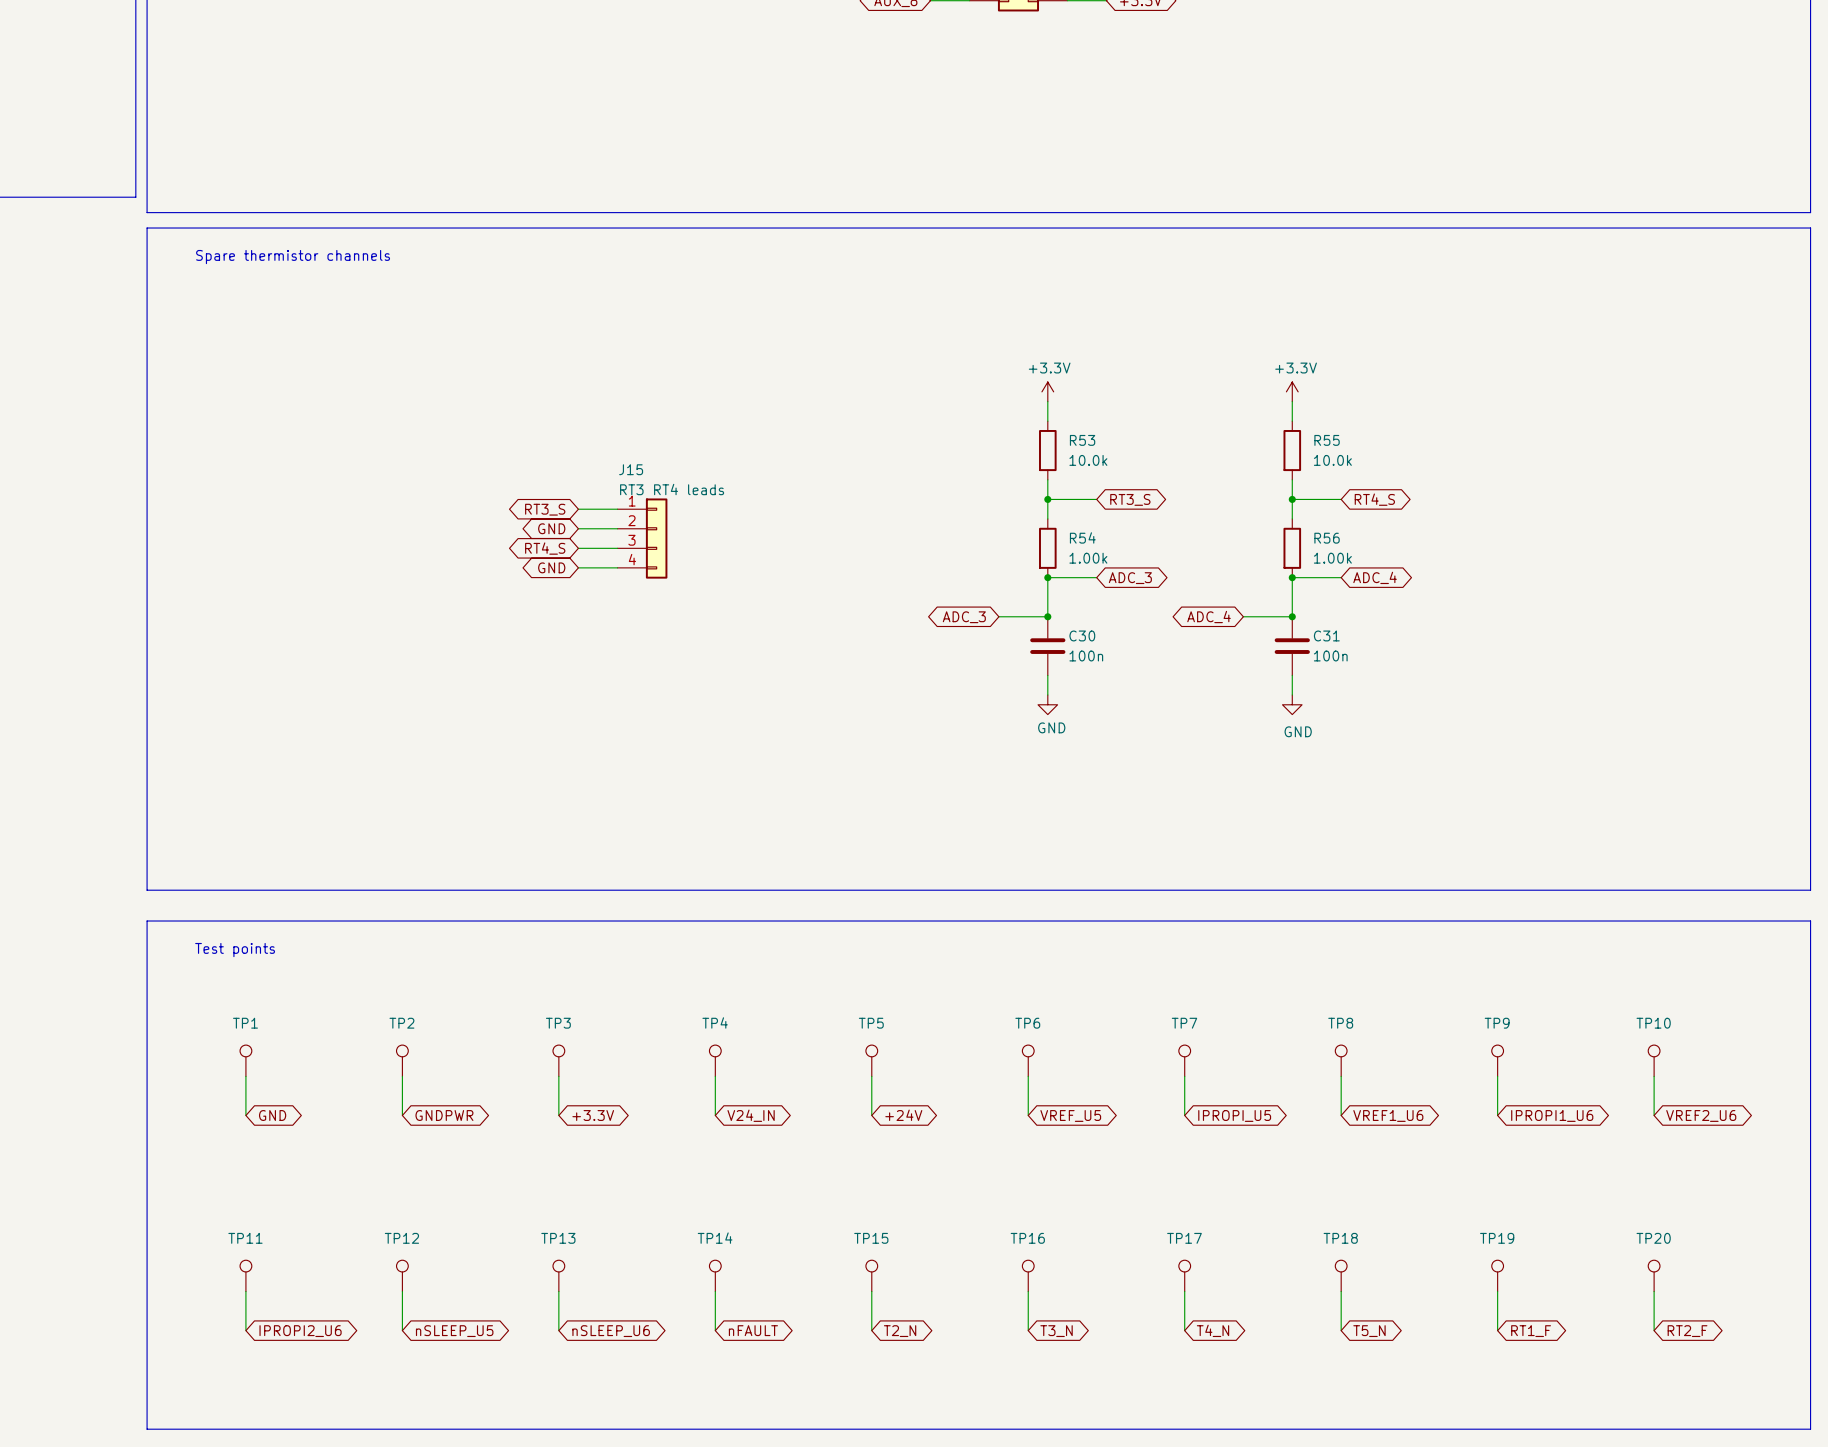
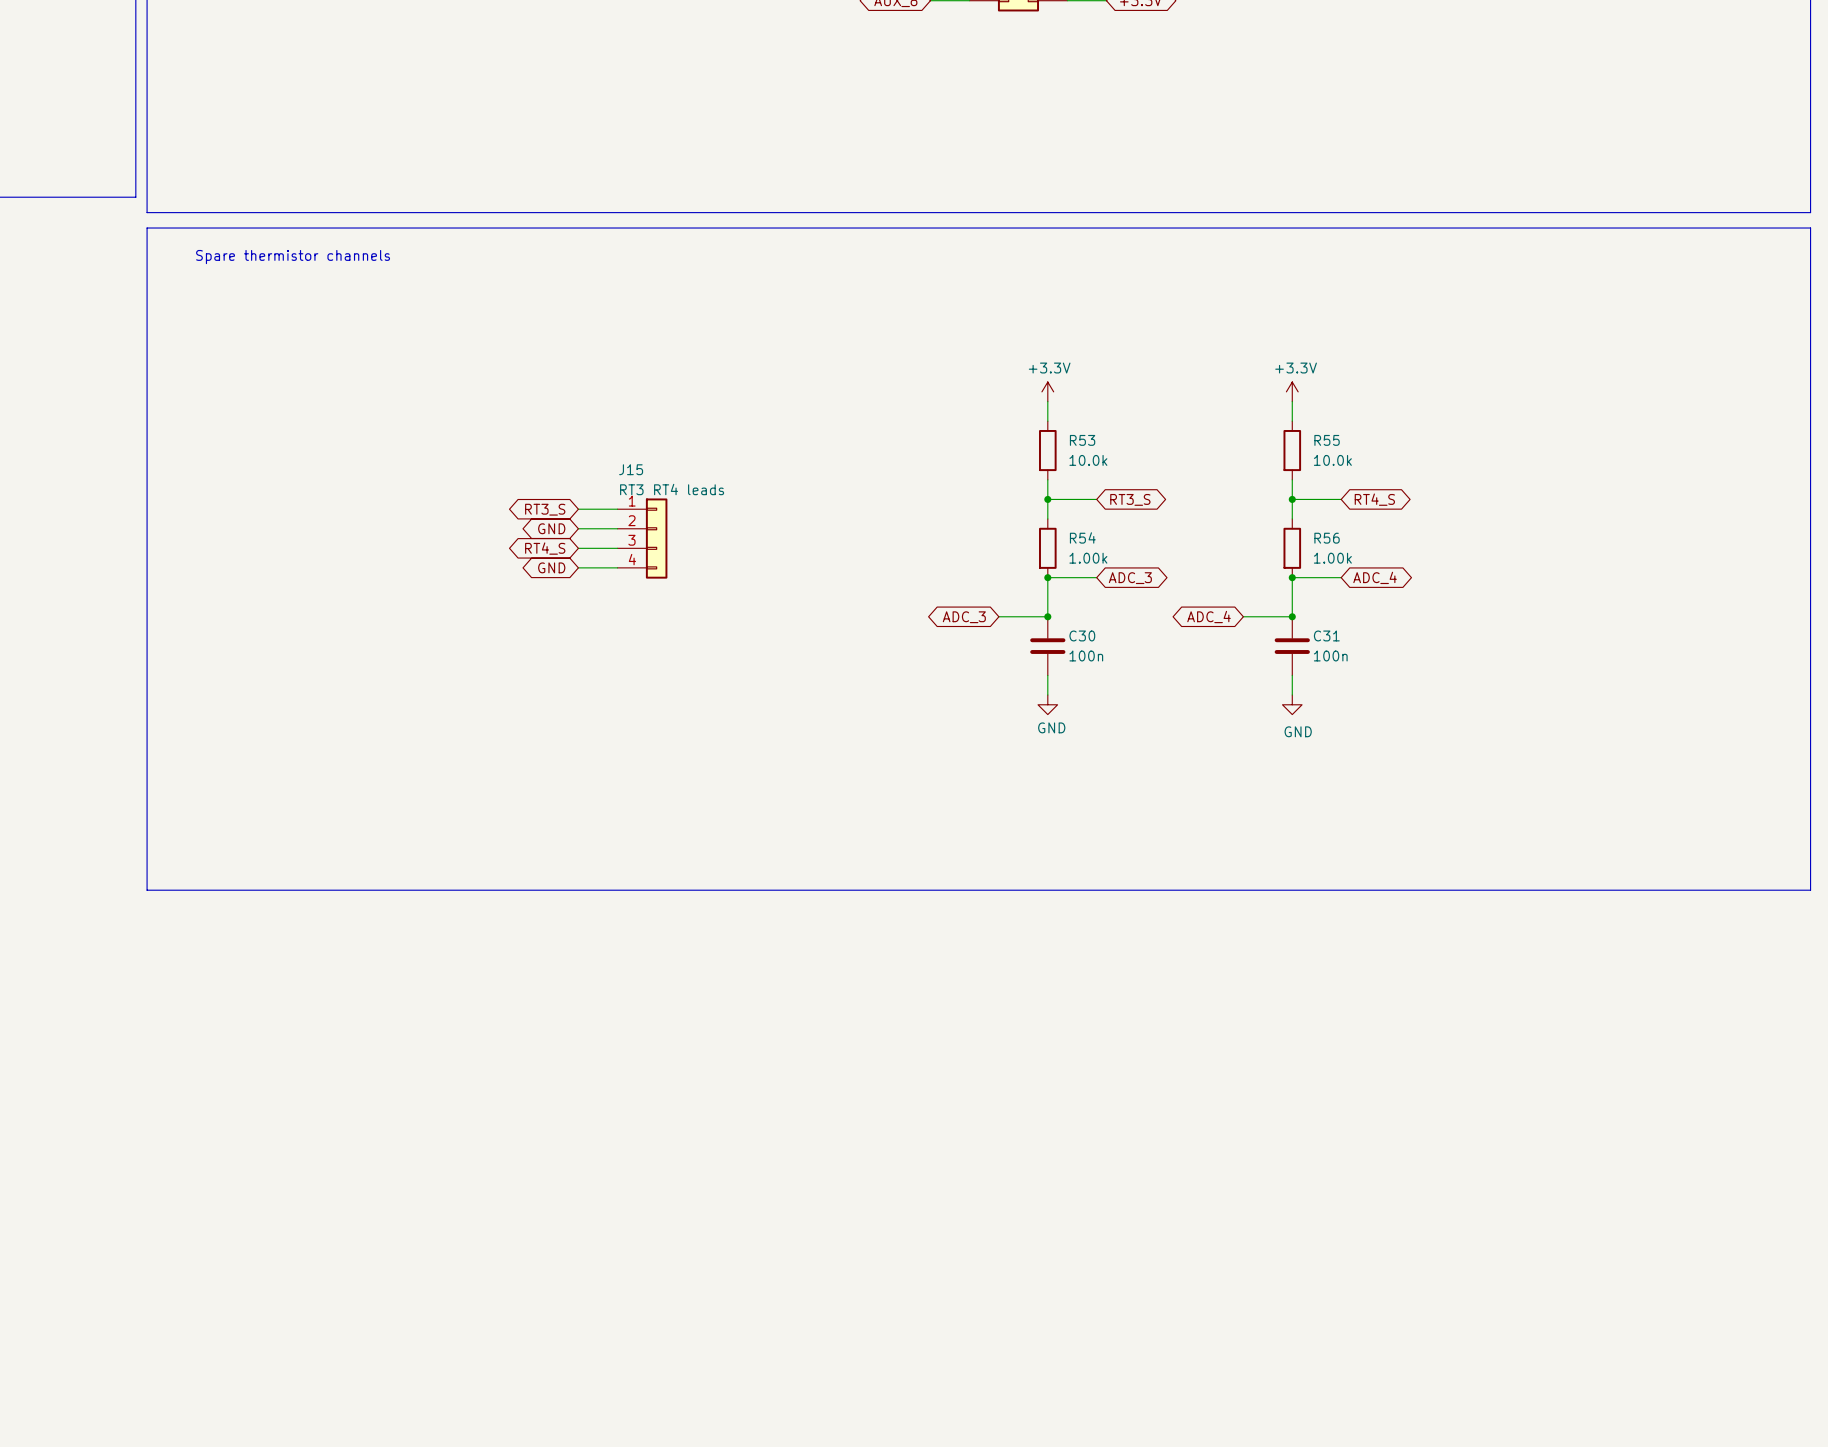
line: (147, 921) (1810, 921) (1810, 1429) (147, 1429) (147, 921) -> none
text: Test points (235, 950) -> none
TP1: (245, 1060) -> none
TP2: (402, 1060) -> none
TP3: (558, 1060) -> none
TP4: (715, 1060) -> none
TP5: (871, 1060) -> none
TP6: (1028, 1060) -> none
TP7: (1184, 1060) -> none
TP8: (1341, 1060) -> none
TP9: (1497, 1060) -> none
TP10: (1654, 1060) -> none
wire: (245, 1076) (245, 1115) -> none
wire: (402, 1076) (402, 1115) -> none
wire: (558, 1076) (558, 1115) -> none
wire: (715, 1076) (715, 1115) -> none
wire: (871, 1076) (871, 1115) -> none
wire: (1028, 1076) (1028, 1115) -> none
wire: (1184, 1076) (1184, 1115) -> none
wire: (1341, 1076) (1341, 1115) -> none
wire: (1497, 1076) (1497, 1115) -> none
wire: (1654, 1076) (1654, 1115) -> none
global label: GND (272, 1115) -> none
global label: GNDPWR (444, 1115) -> none
global label: +3.3V (593, 1115) -> none
global label: V24_IN (751, 1115) -> none
global label: +24V (903, 1115) -> none
global label: VREF_U5 (1070, 1115) -> none
global label: IPROPI_U5 (1234, 1115) -> none
global label: VREF1_U6 (1388, 1115) -> none
global label: IPROPI1_U6 (1552, 1115) -> none
global label: VREF2_U6 (1701, 1115) -> none
TP11: (245, 1275) -> none
TP12: (402, 1275) -> none
TP13: (558, 1275) -> none
TP14: (715, 1275) -> none
TP15: (871, 1275) -> none
TP16: (1028, 1275) -> none
TP17: (1184, 1275) -> none
TP18: (1341, 1275) -> none
TP19: (1497, 1275) -> none
TP20: (1654, 1275) -> none
wire: (245, 1291) (245, 1330) -> none
wire: (402, 1291) (402, 1330) -> none
wire: (558, 1291) (558, 1330) -> none
wire: (715, 1291) (715, 1330) -> none
wire: (871, 1291) (871, 1330) -> none
wire: (1028, 1291) (1028, 1330) -> none
wire: (1184, 1291) (1184, 1330) -> none
wire: (1341, 1291) (1341, 1330) -> none
wire: (1497, 1291) (1497, 1330) -> none
wire: (1654, 1291) (1654, 1330) -> none
global label: nFAULT (753, 1330) -> none
global label: T4_N (1213, 1330) -> none
global label: IPROPI2_U6 (300, 1331) -> none
global label: nSLEEP_U5 (454, 1331) -> none
global label: nSLEEP_U6 (611, 1331) -> none
global label: T2_N (900, 1331) -> none
global label: T3_N (1056, 1331) -> none
global label: T5_N (1369, 1331) -> none
global label: RT1_F (1531, 1331) -> none
global label: RT2_F (1687, 1331) -> none

